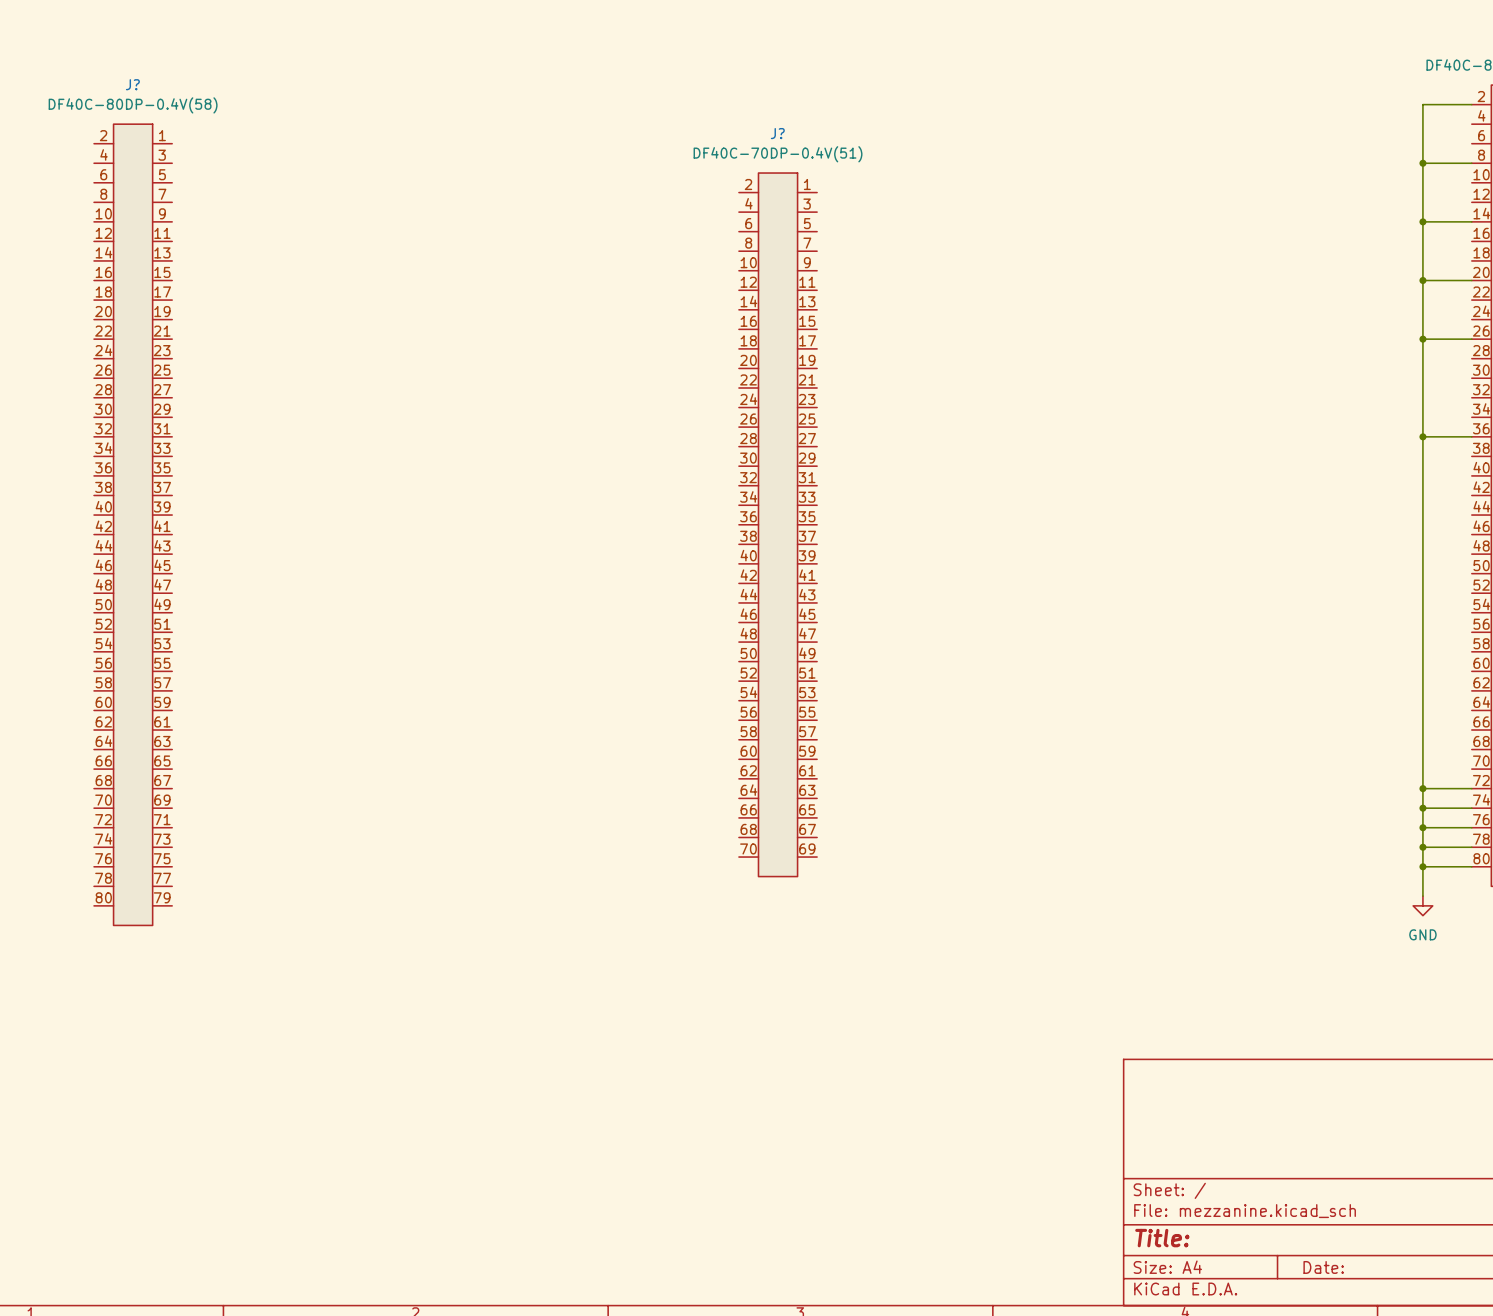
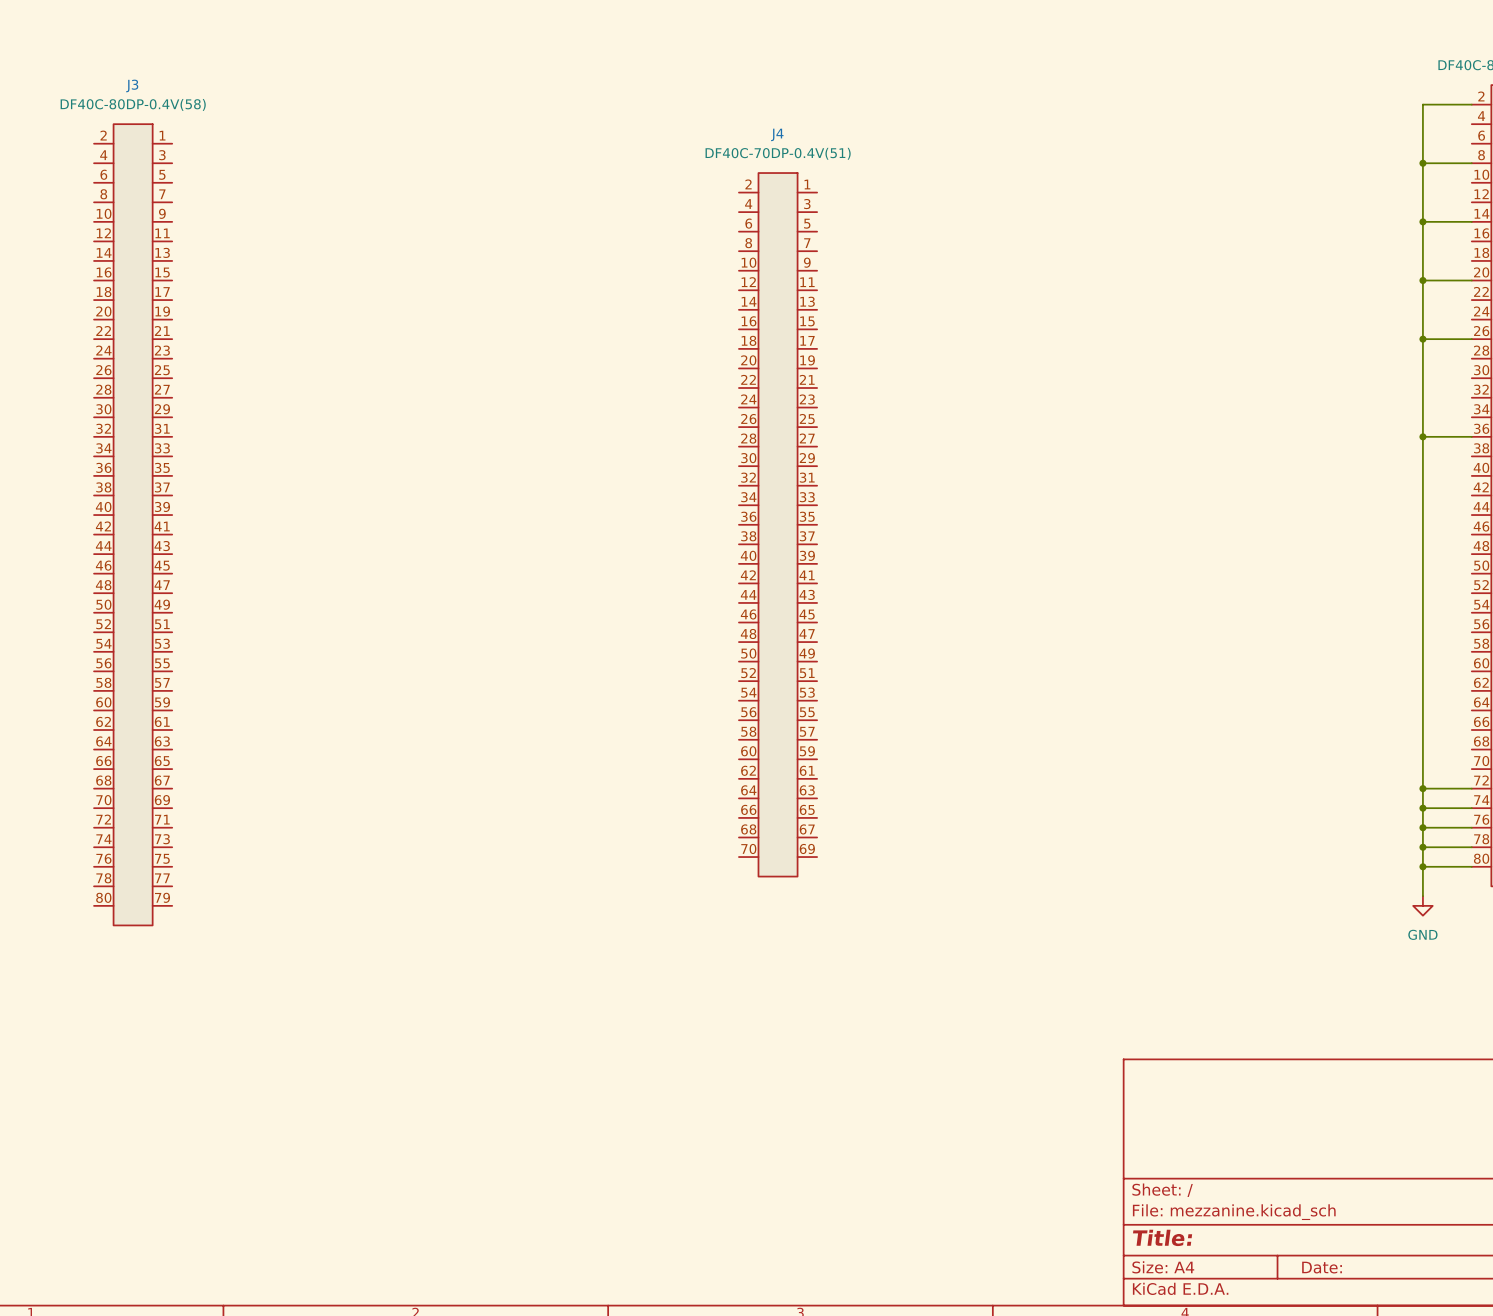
J? name: J? (132, 84) -> J3 (132, 85)
J? name: J? (777, 133) -> J4 (777, 134)

